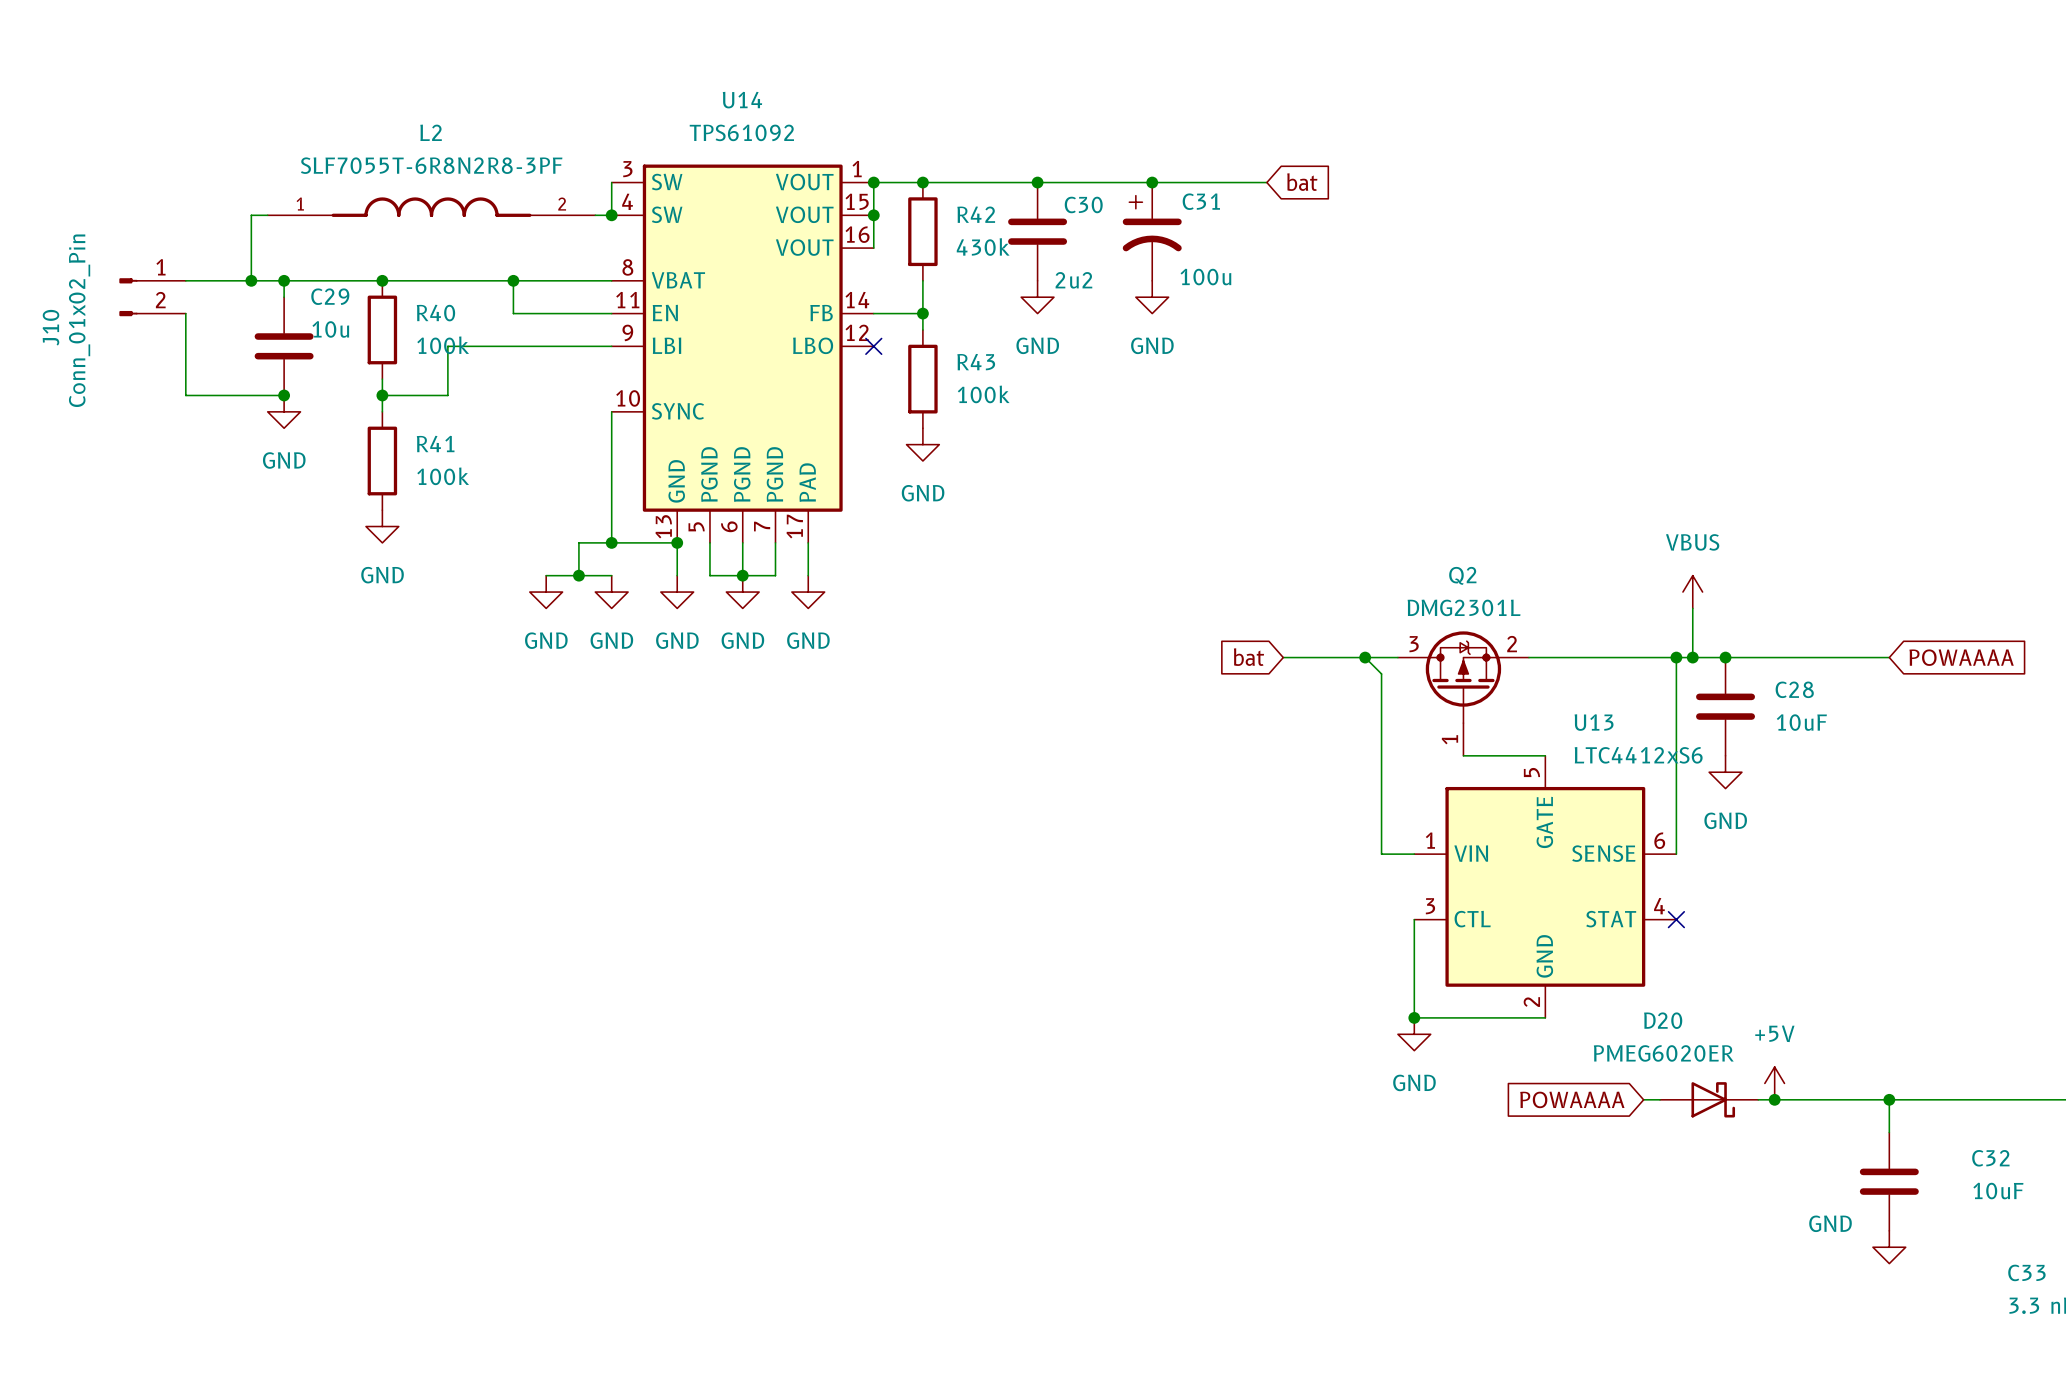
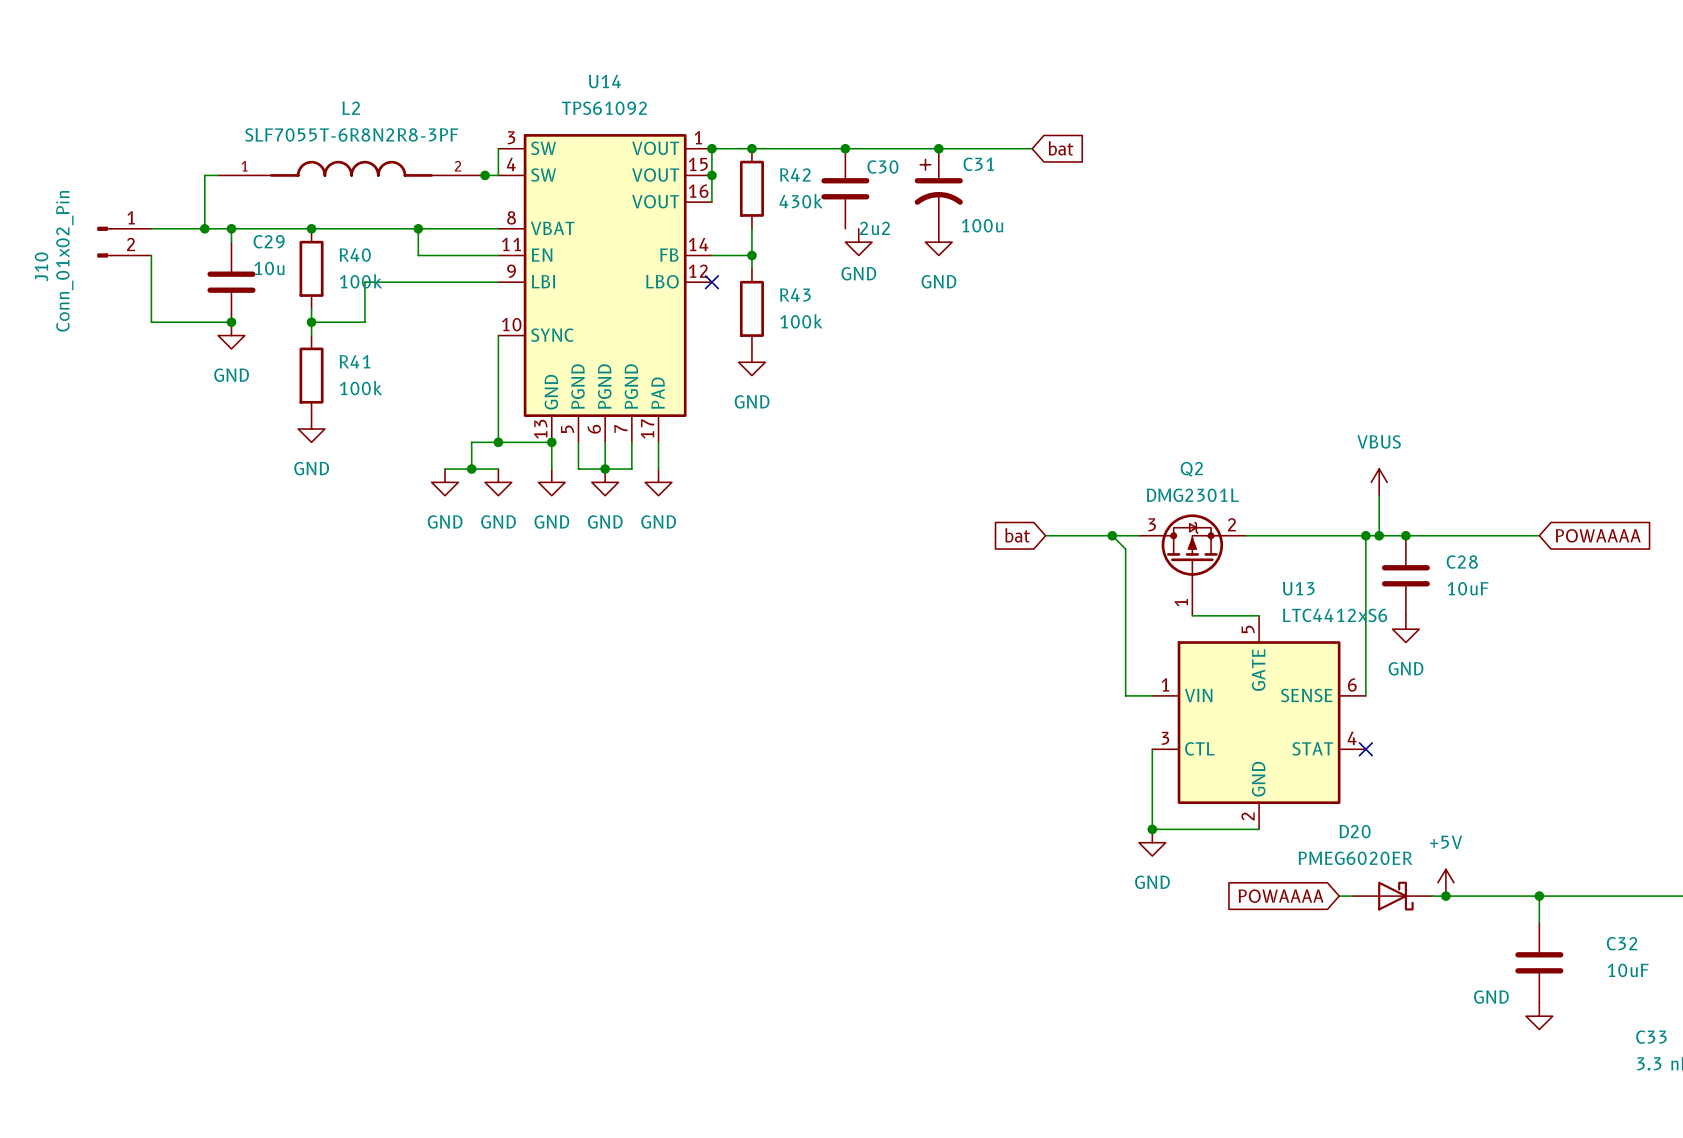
junction position: (611, 215) -> (485, 175)
power symbol position: GND (1037, 297) -> GND (858, 242)
power symbol text position: GND (1037, 345) -> GND (858, 273)

